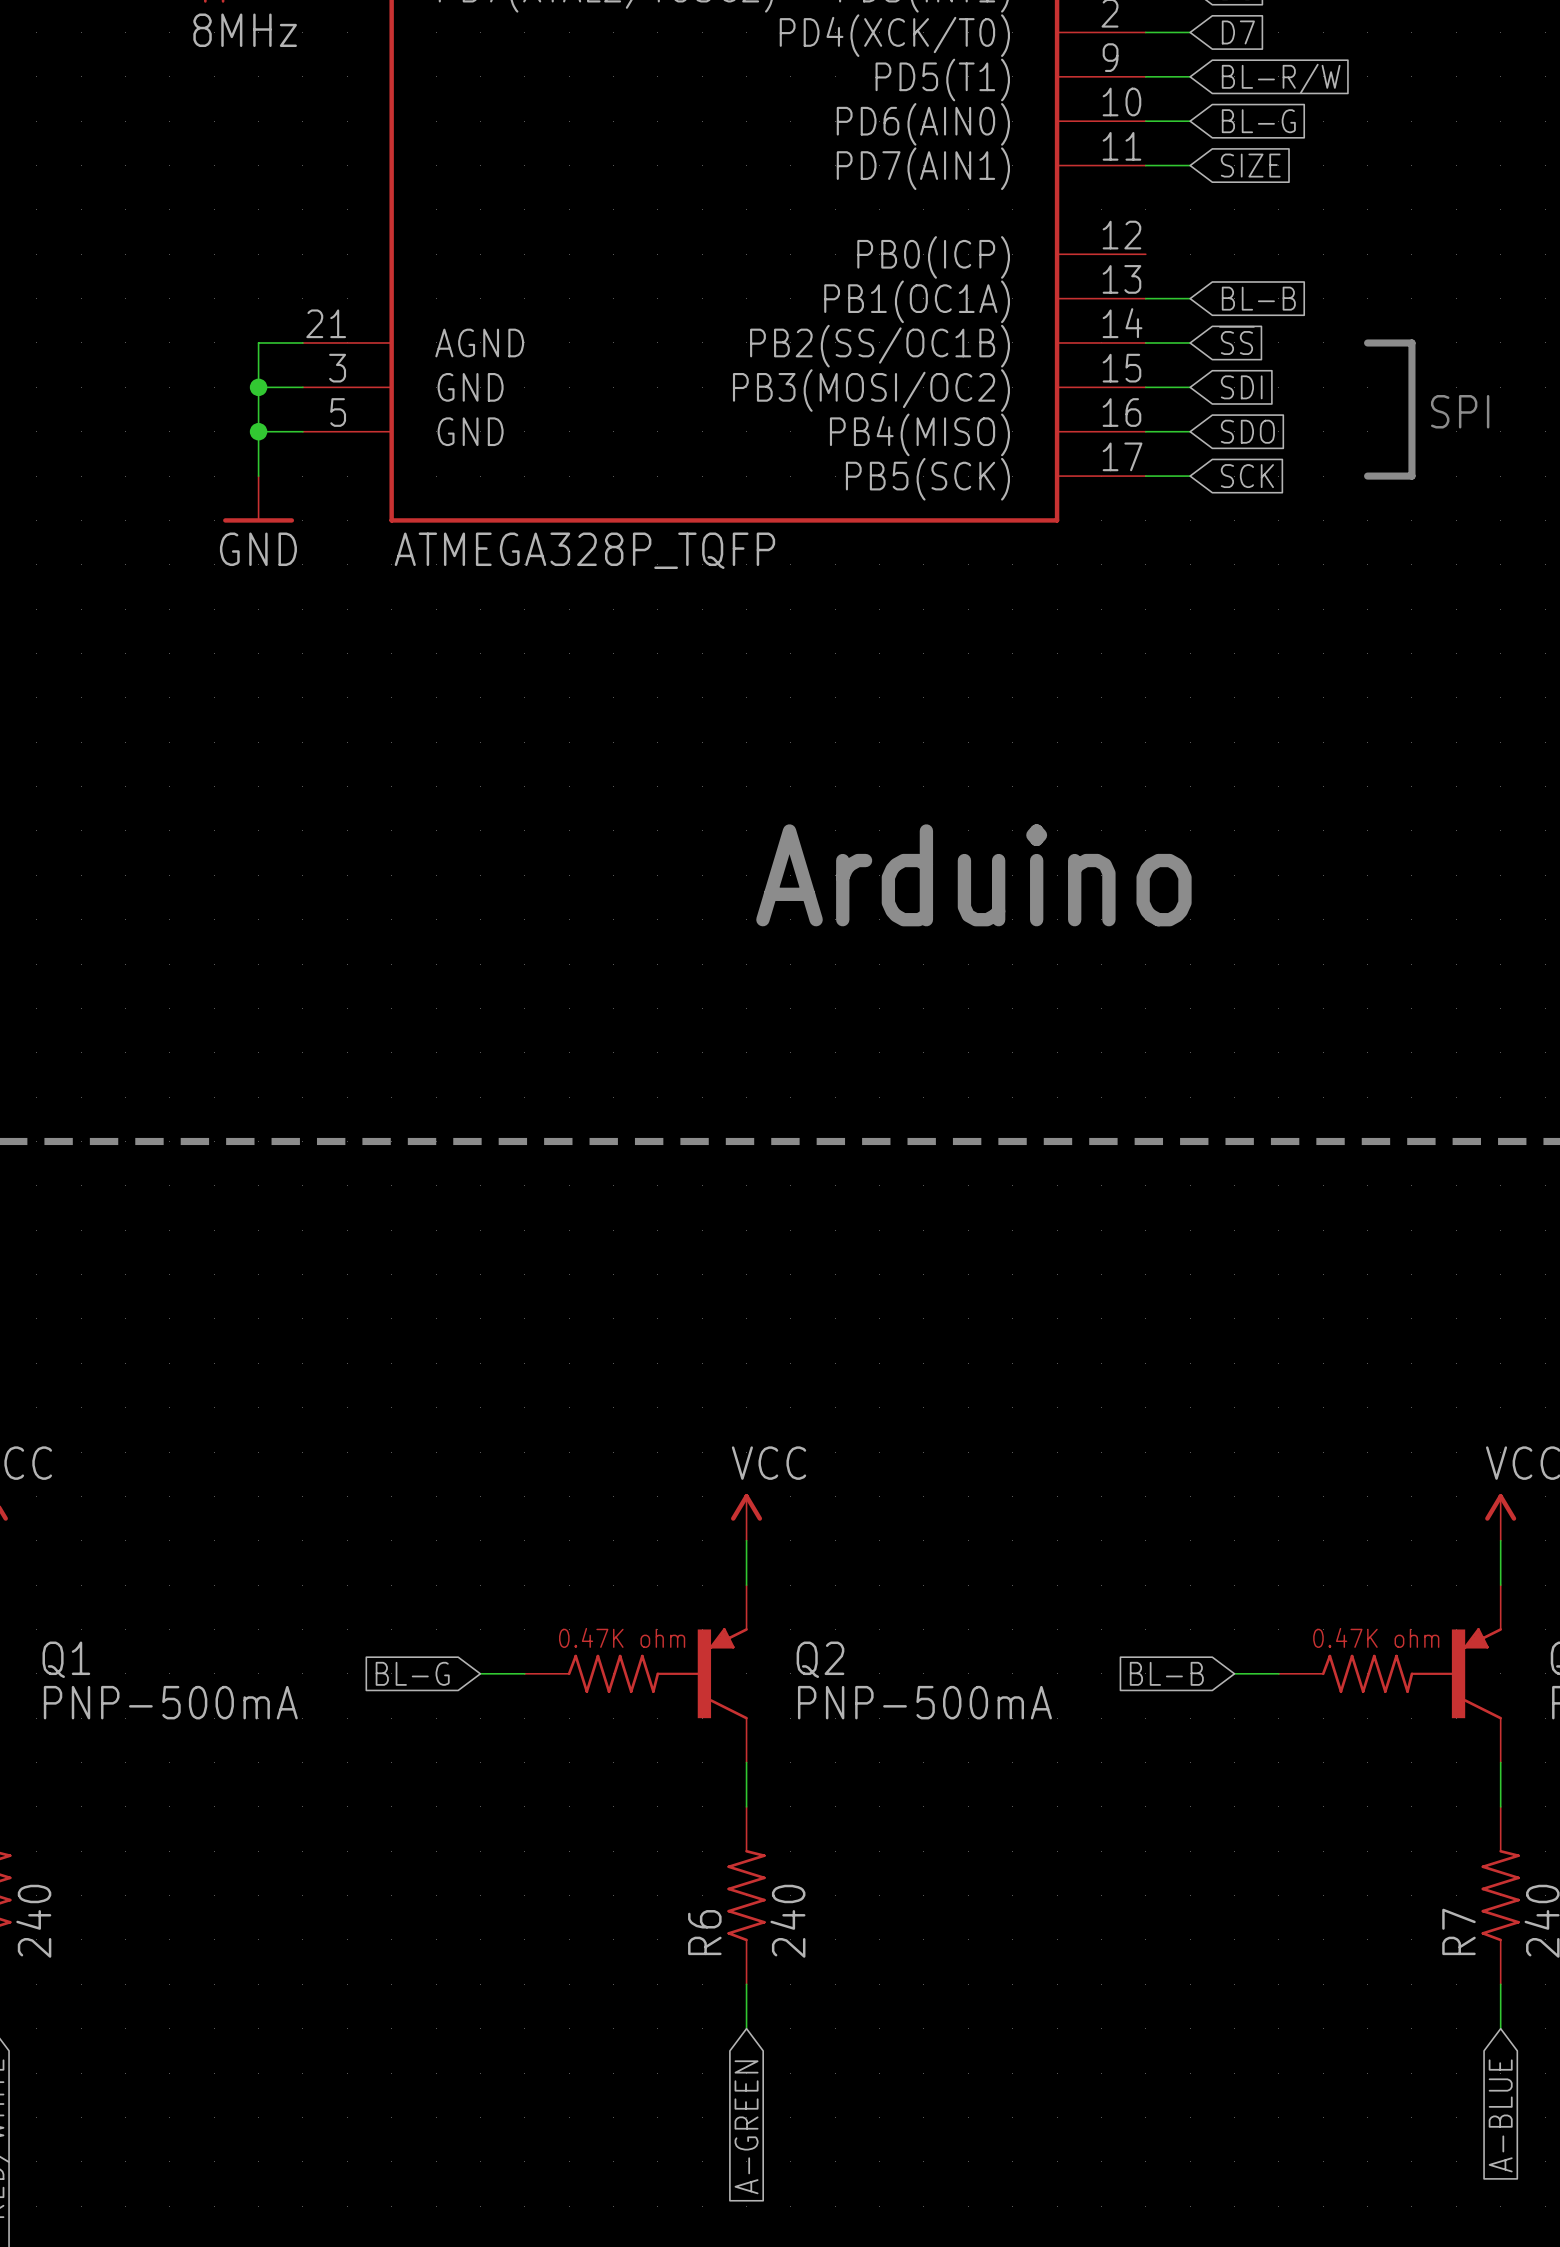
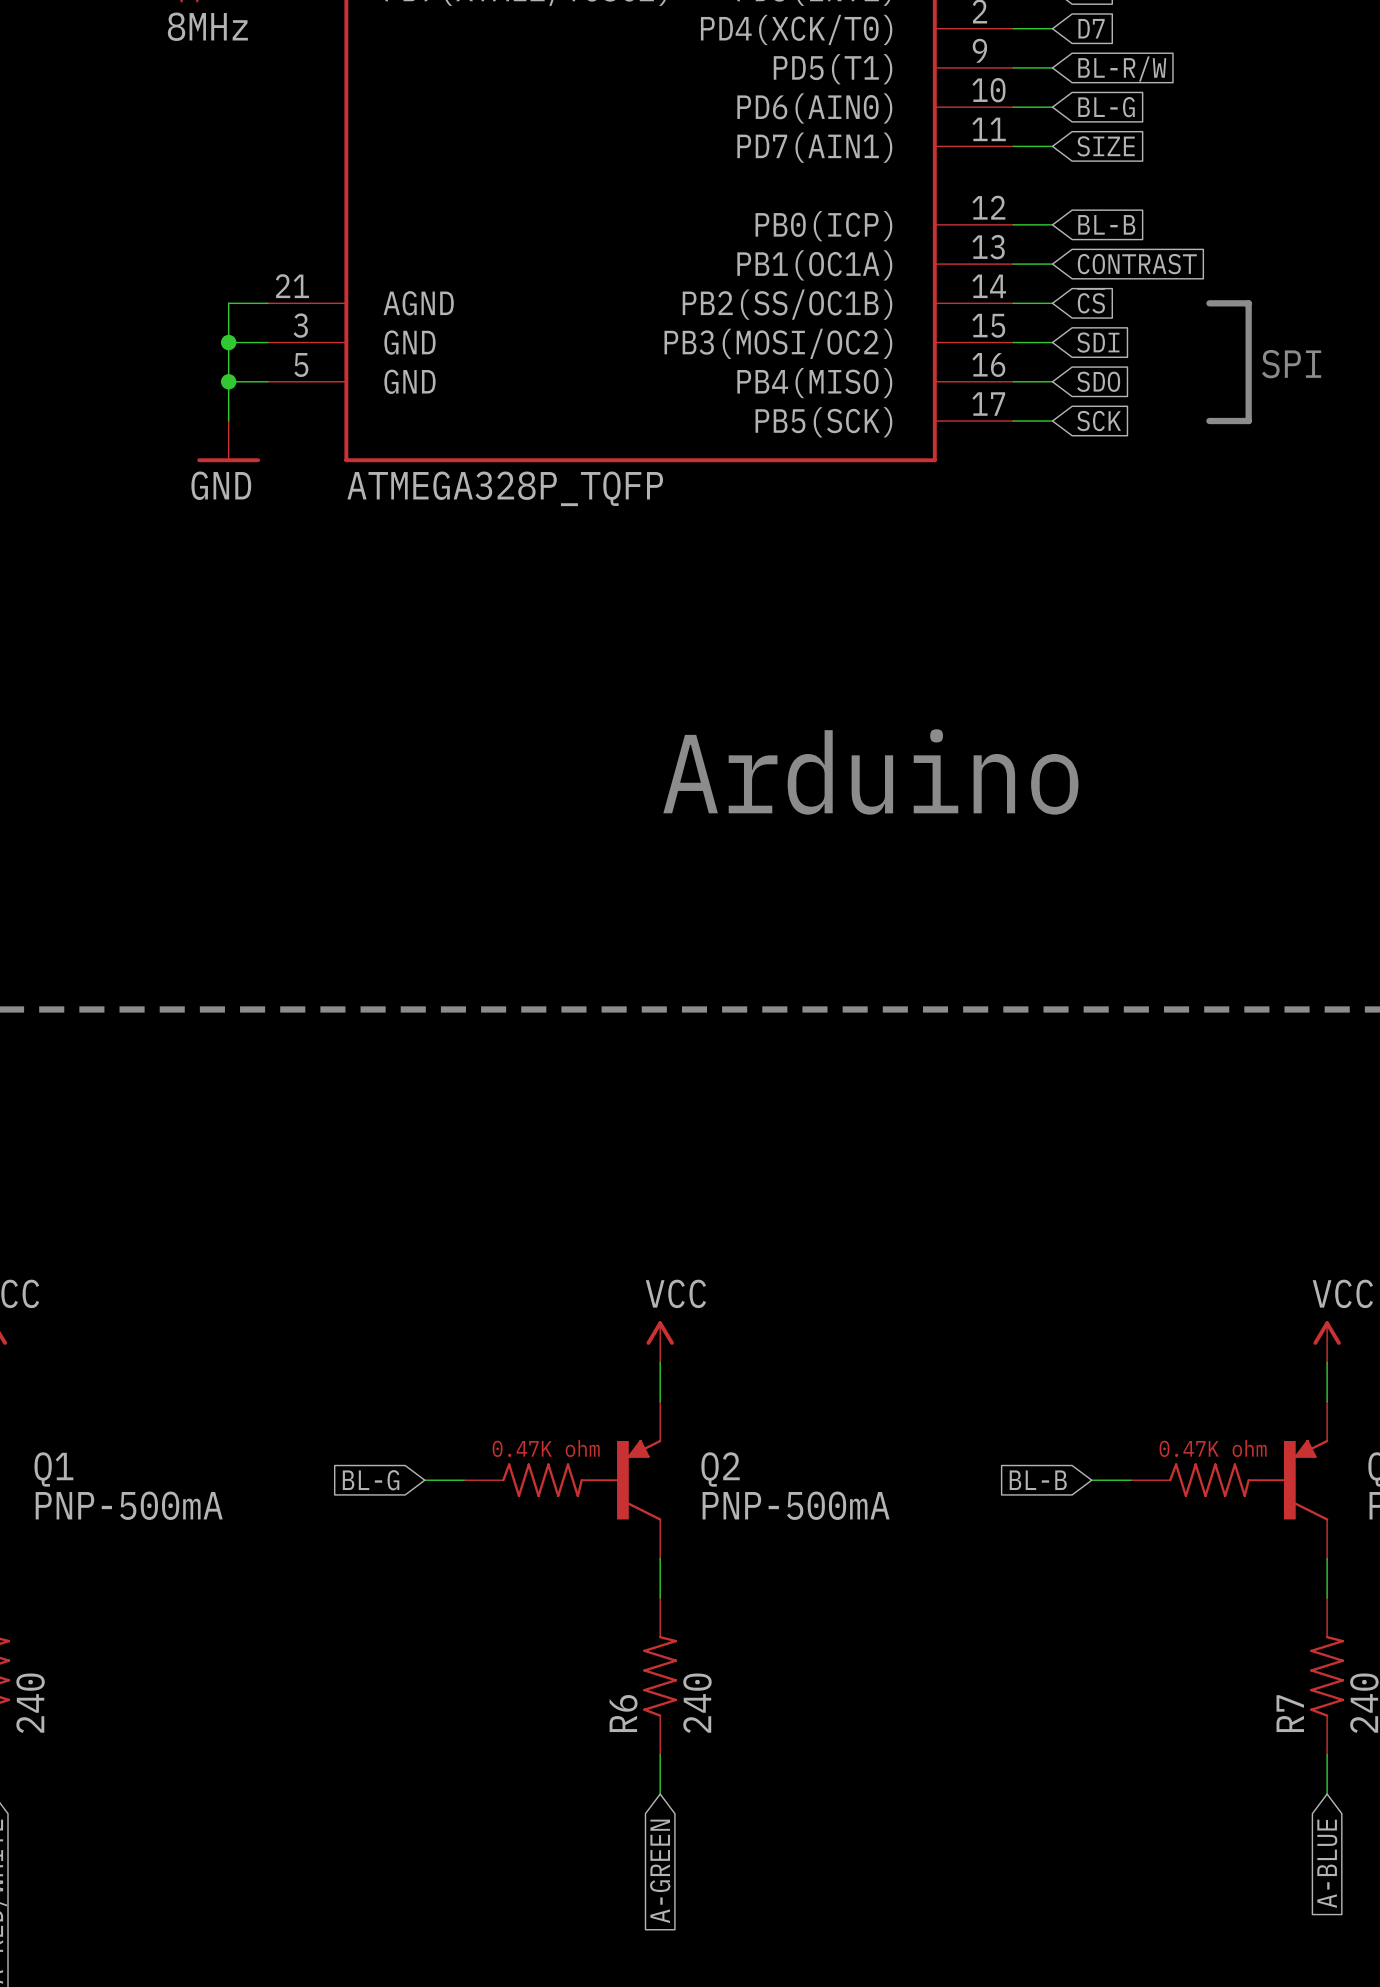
wire: none -> (1013, 224) (1052, 224)
global label: none -> BL-B (1106, 224)
global label: BL-B (1258, 298) -> CONTRAST (1137, 264)
global label: ~{SS} (1236, 340) -> ~{CS} (1091, 301)

